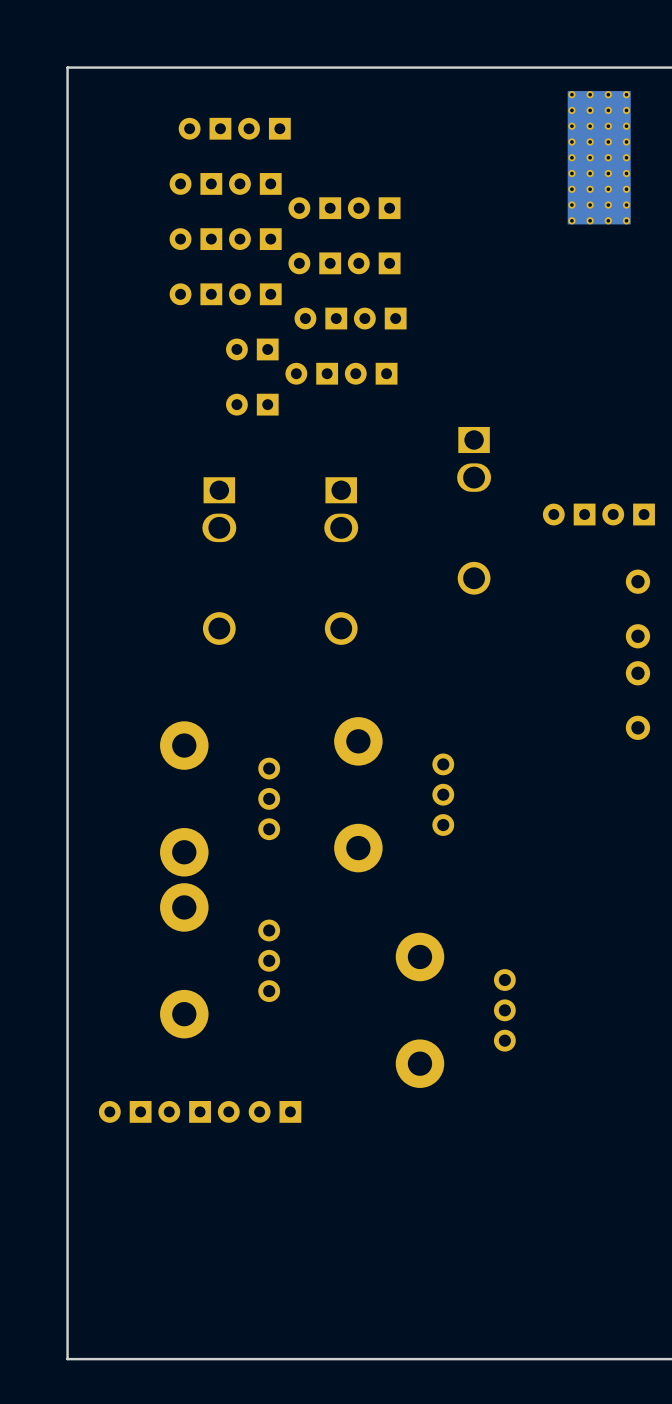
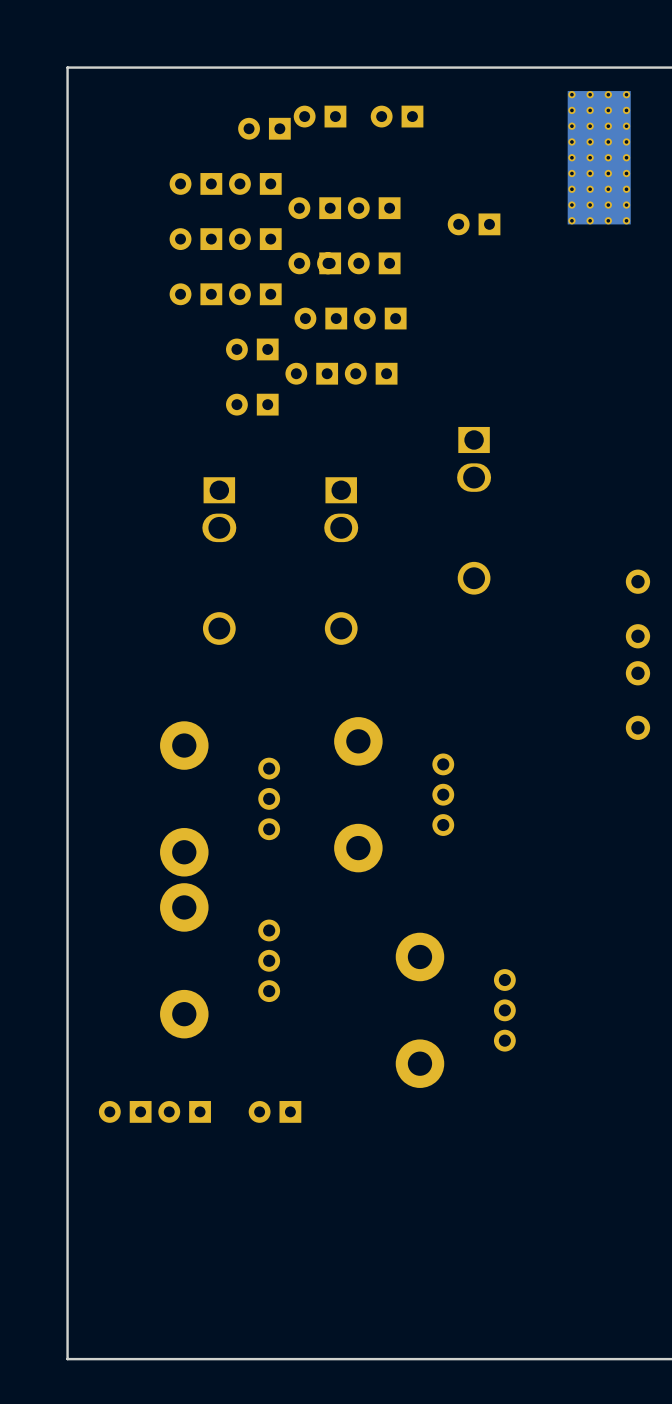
part: none -> (320, 116)
part: none -> (397, 116)
part: (205, 128) -> none
part: none -> (474, 224)
part: none -> (358, 263)
part: (569, 514) -> none
part: (628, 514) -> none
part: (259, 1111) -> none

